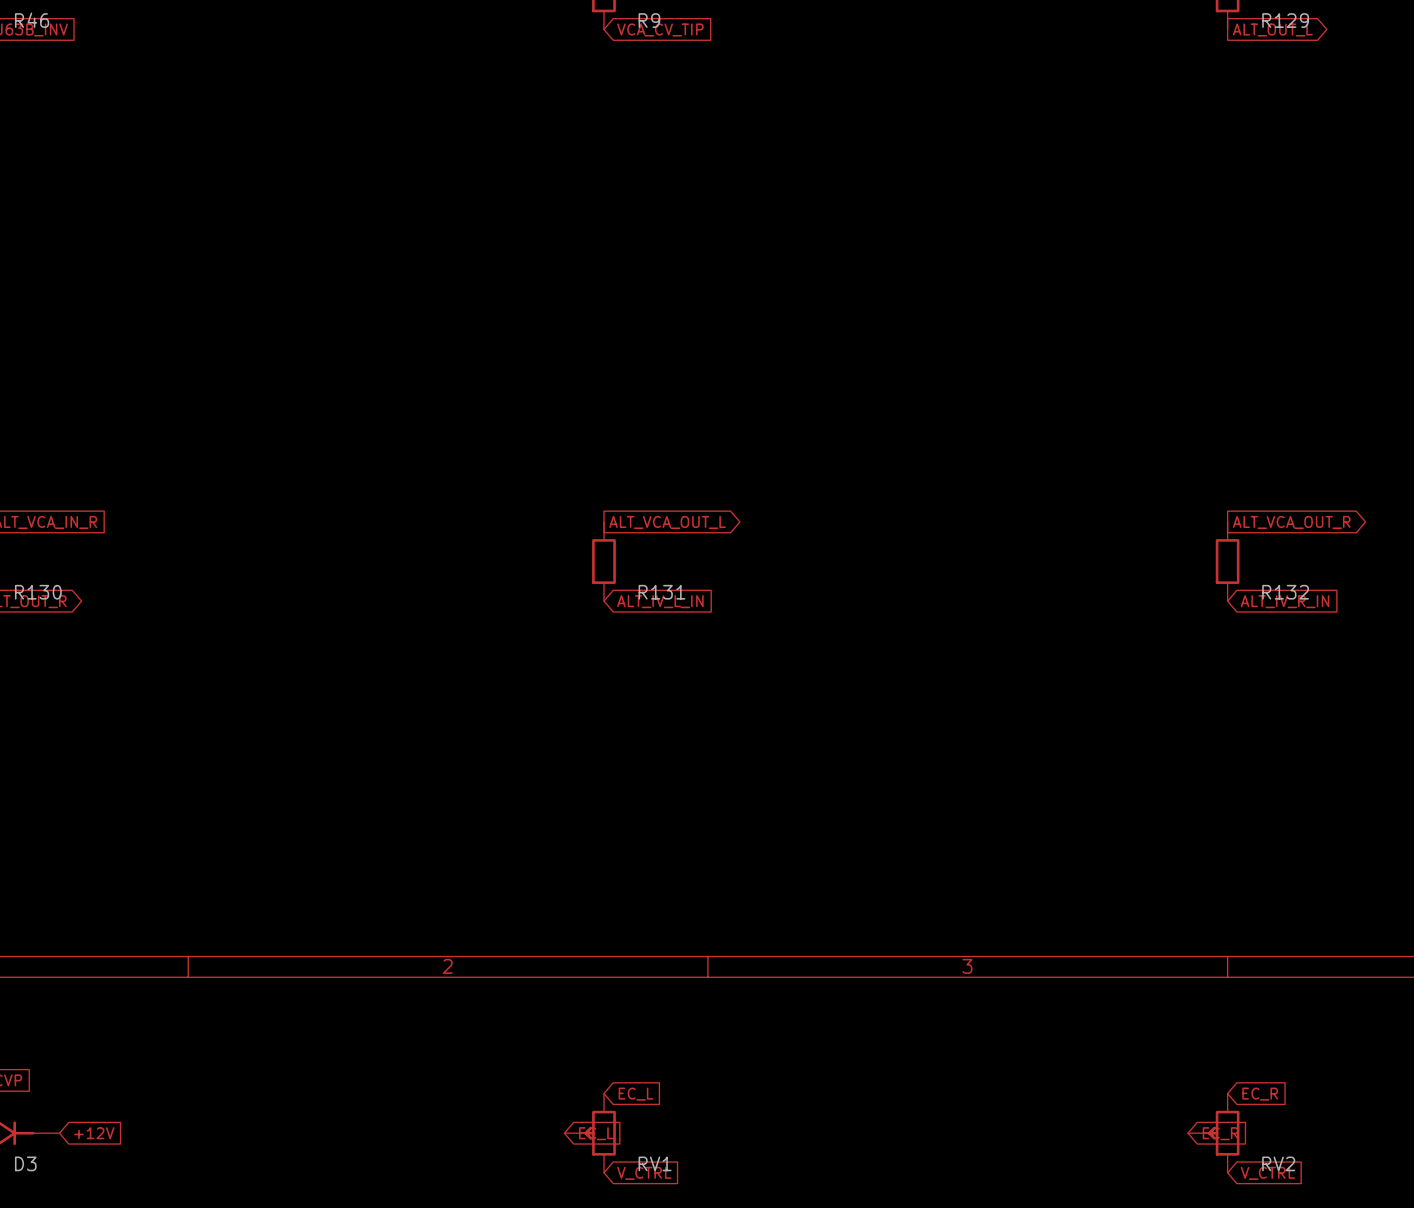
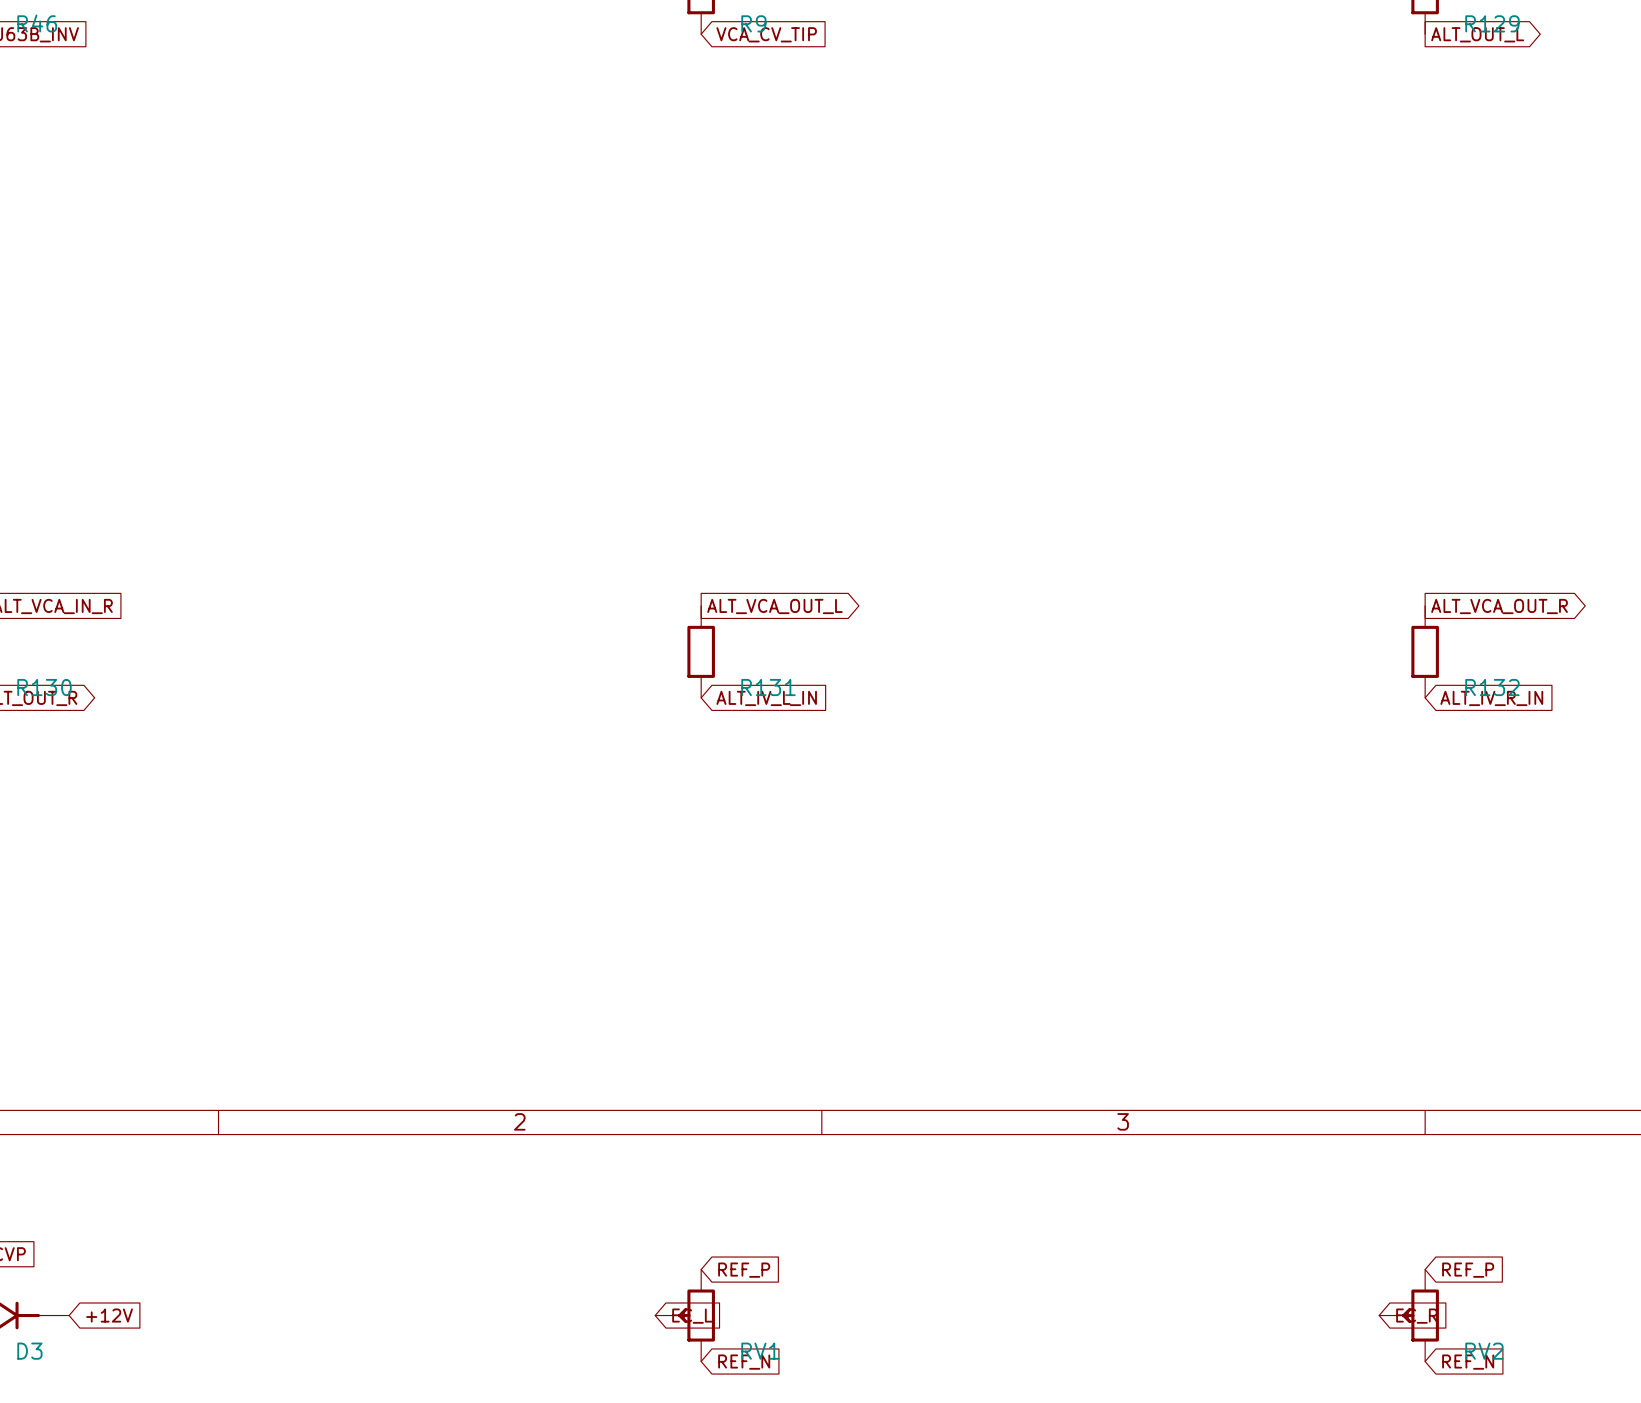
global label: EC_L (636, 1094) -> REF_P (744, 1270)
global label: EC_R (1260, 1094) -> REF_P (1468, 1270)
global label: V_CTRL (644, 1173) -> REF_N (744, 1362)
global label: V_CTRL (1267, 1173) -> REF_N (1468, 1362)

